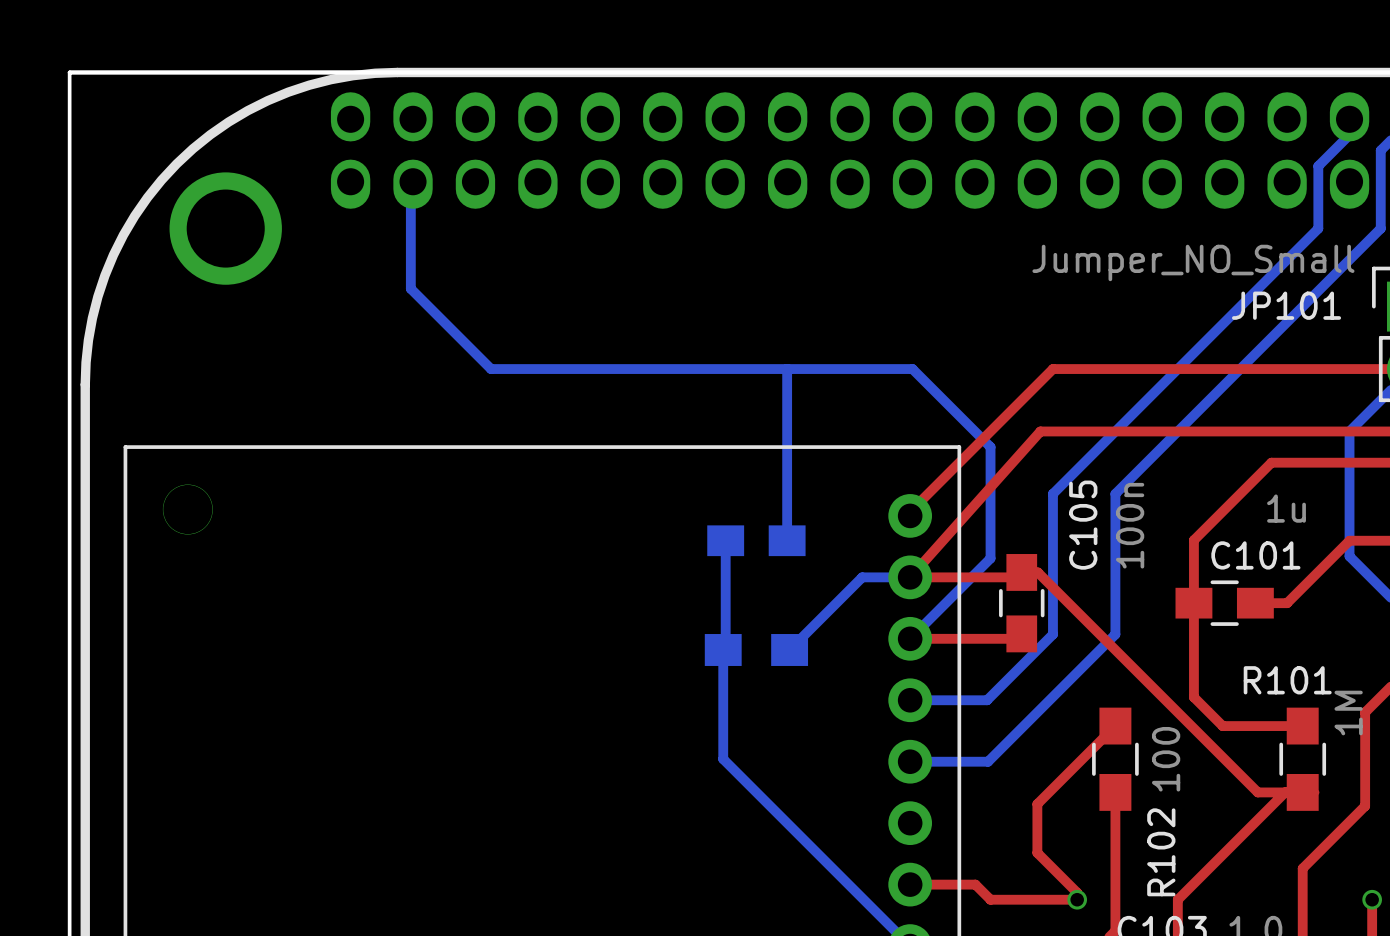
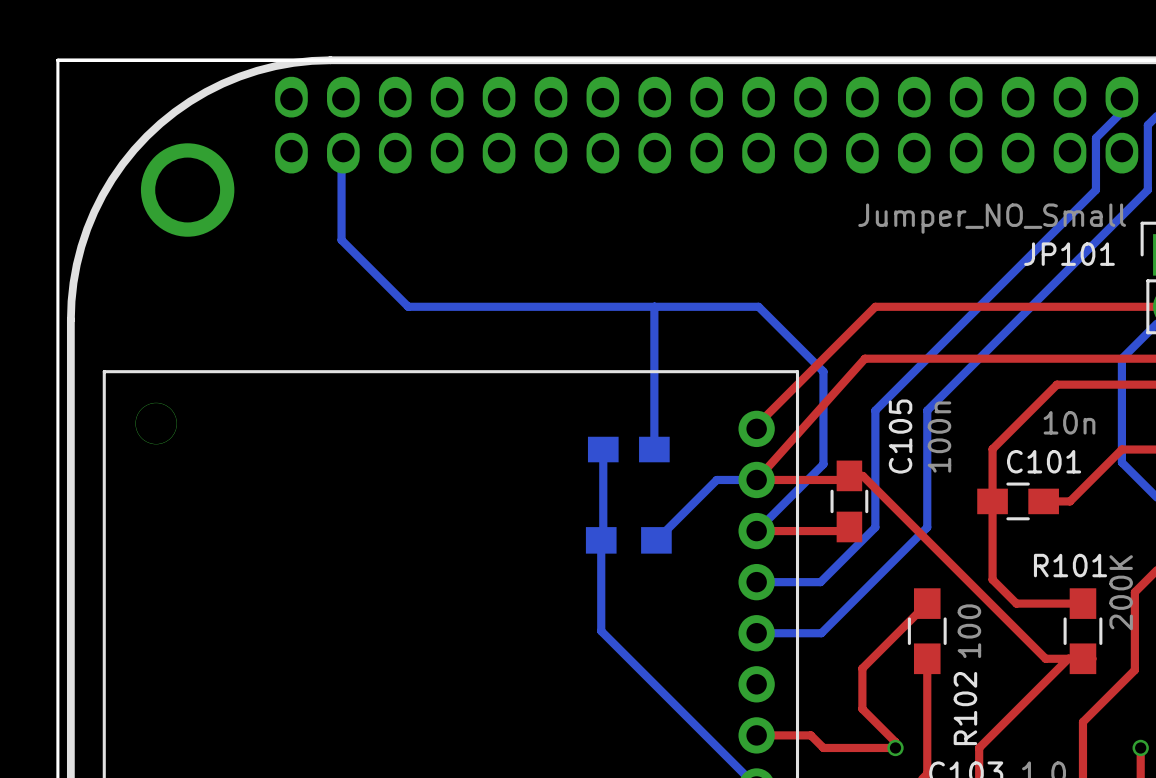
C101 value: 1u (1286, 508) -> 10n (1069, 422)
R101 value: 1M (1348, 713) -> 200K (1121, 592)

